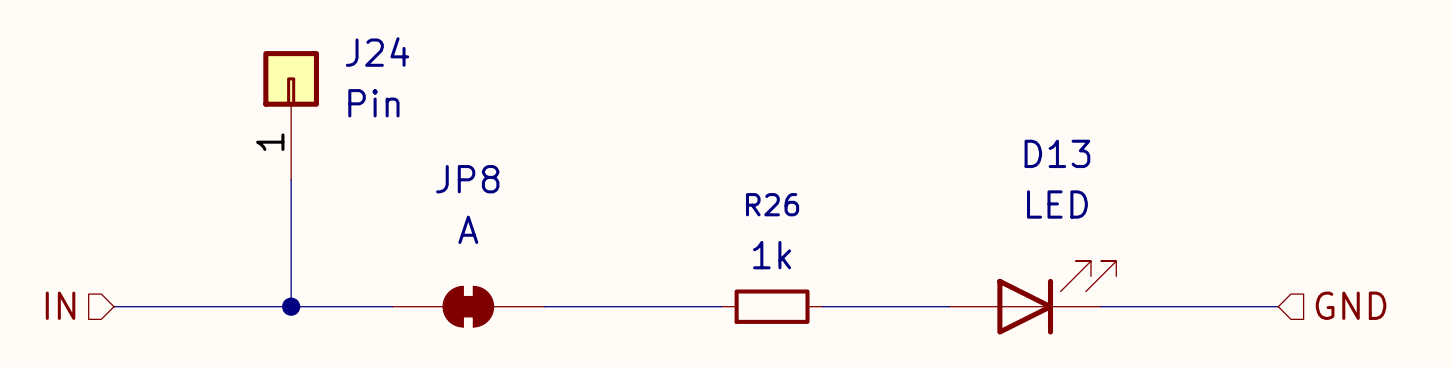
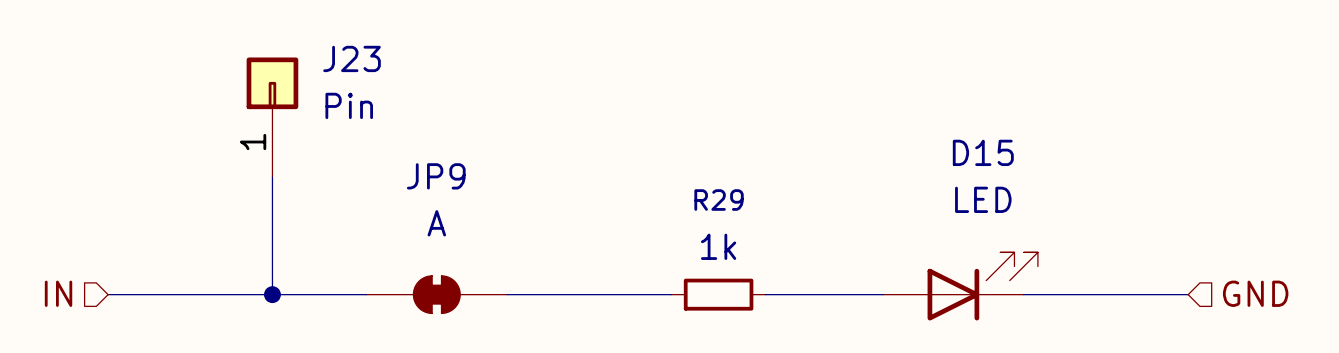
J24 name: J24 (377, 52) -> J23 (352, 58)
D13 name: D13 (1057, 153) -> D15 (983, 152)
JP8 name: JP8 (467, 179) -> JP9 (436, 176)
R26 name: R26 (772, 204) -> R29 (719, 200)

